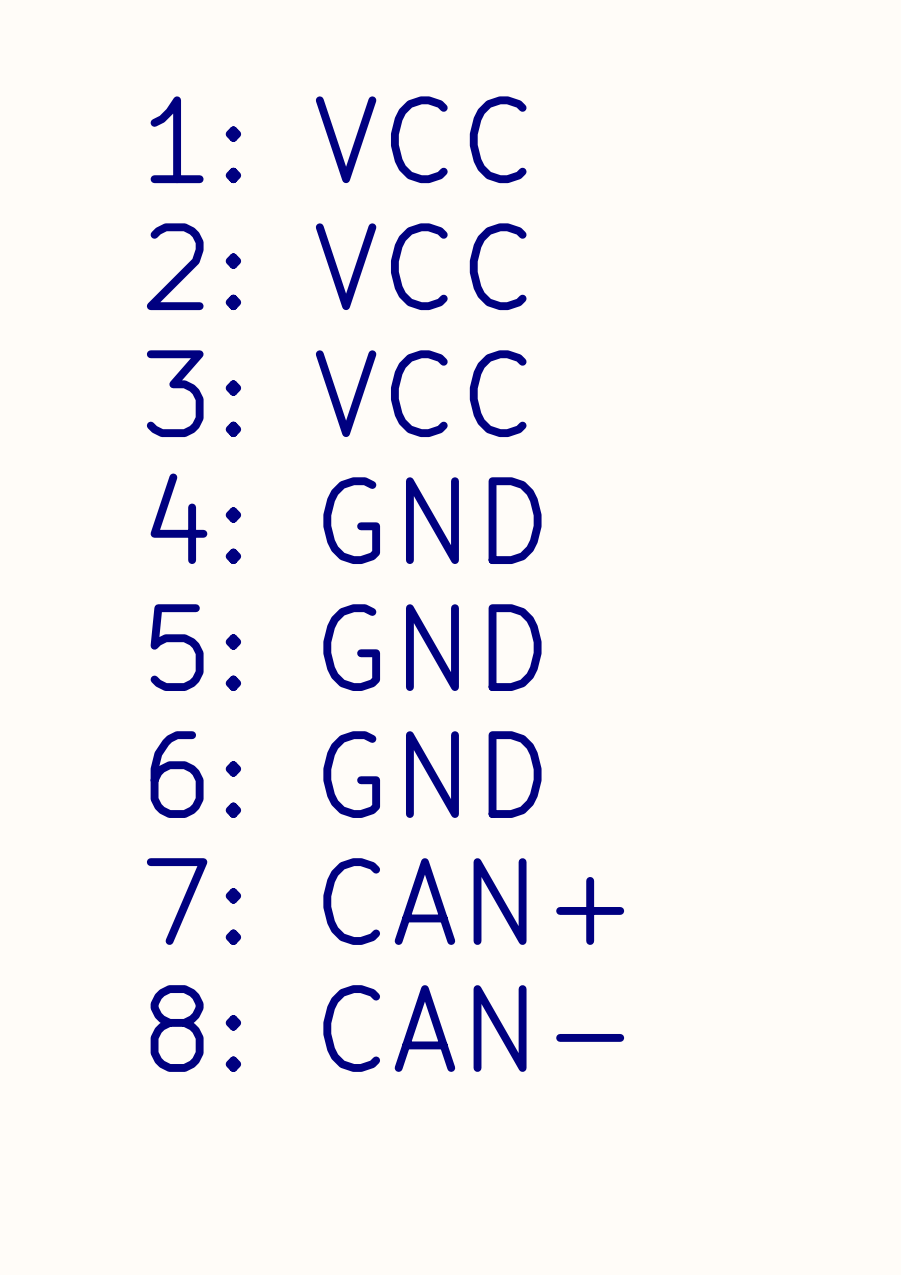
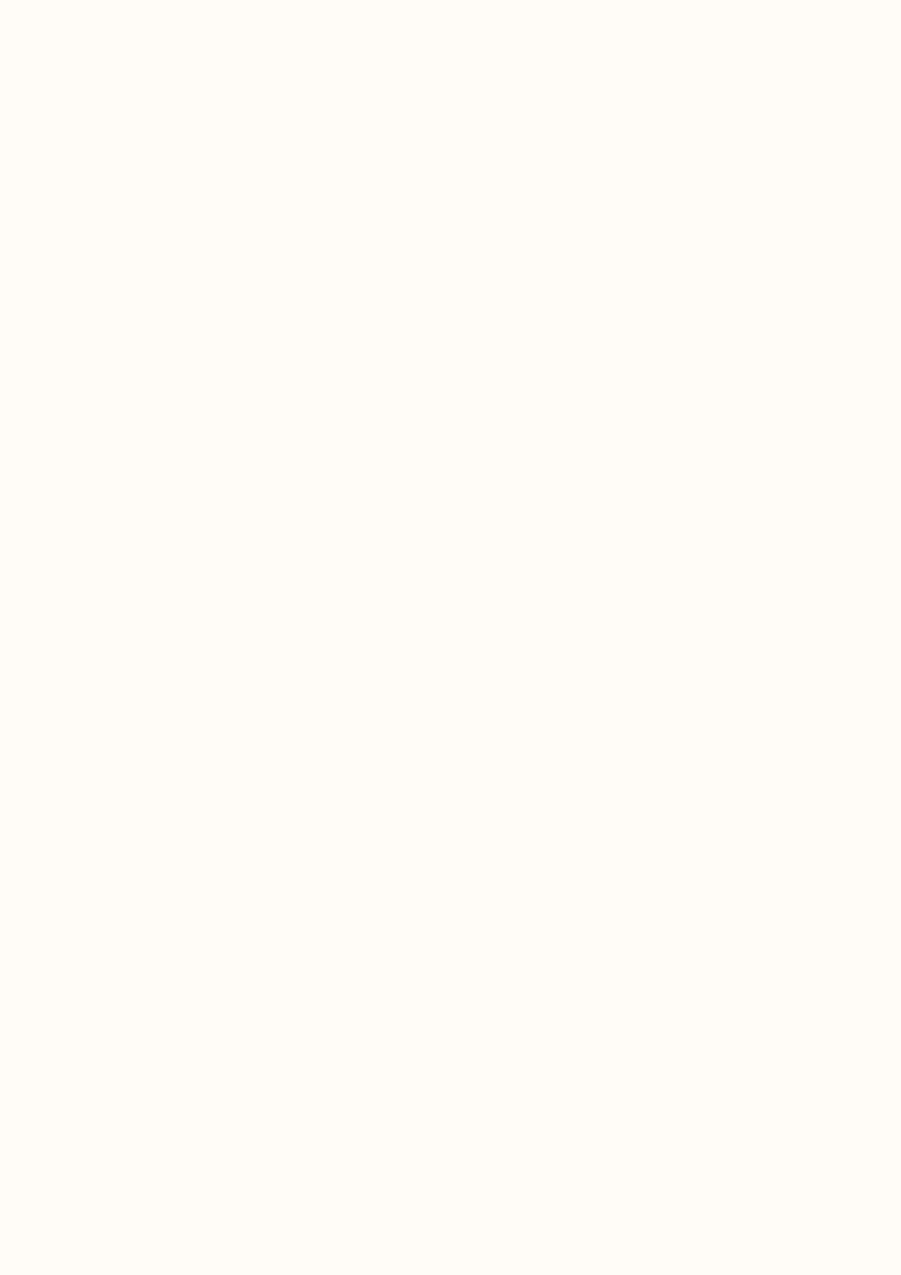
text: 1: VCC (338, 139) -> none
text: 2: VCC (336, 266) -> none
text: 3: VCC (336, 393) -> none
text: 4: GND (346, 518) -> none
text: 5: GND (346, 647) -> none
text: 6: GND (346, 774) -> none
text: 7: CAN+ (385, 901) -> none
text: 8: CAN- (387, 1028) -> none

